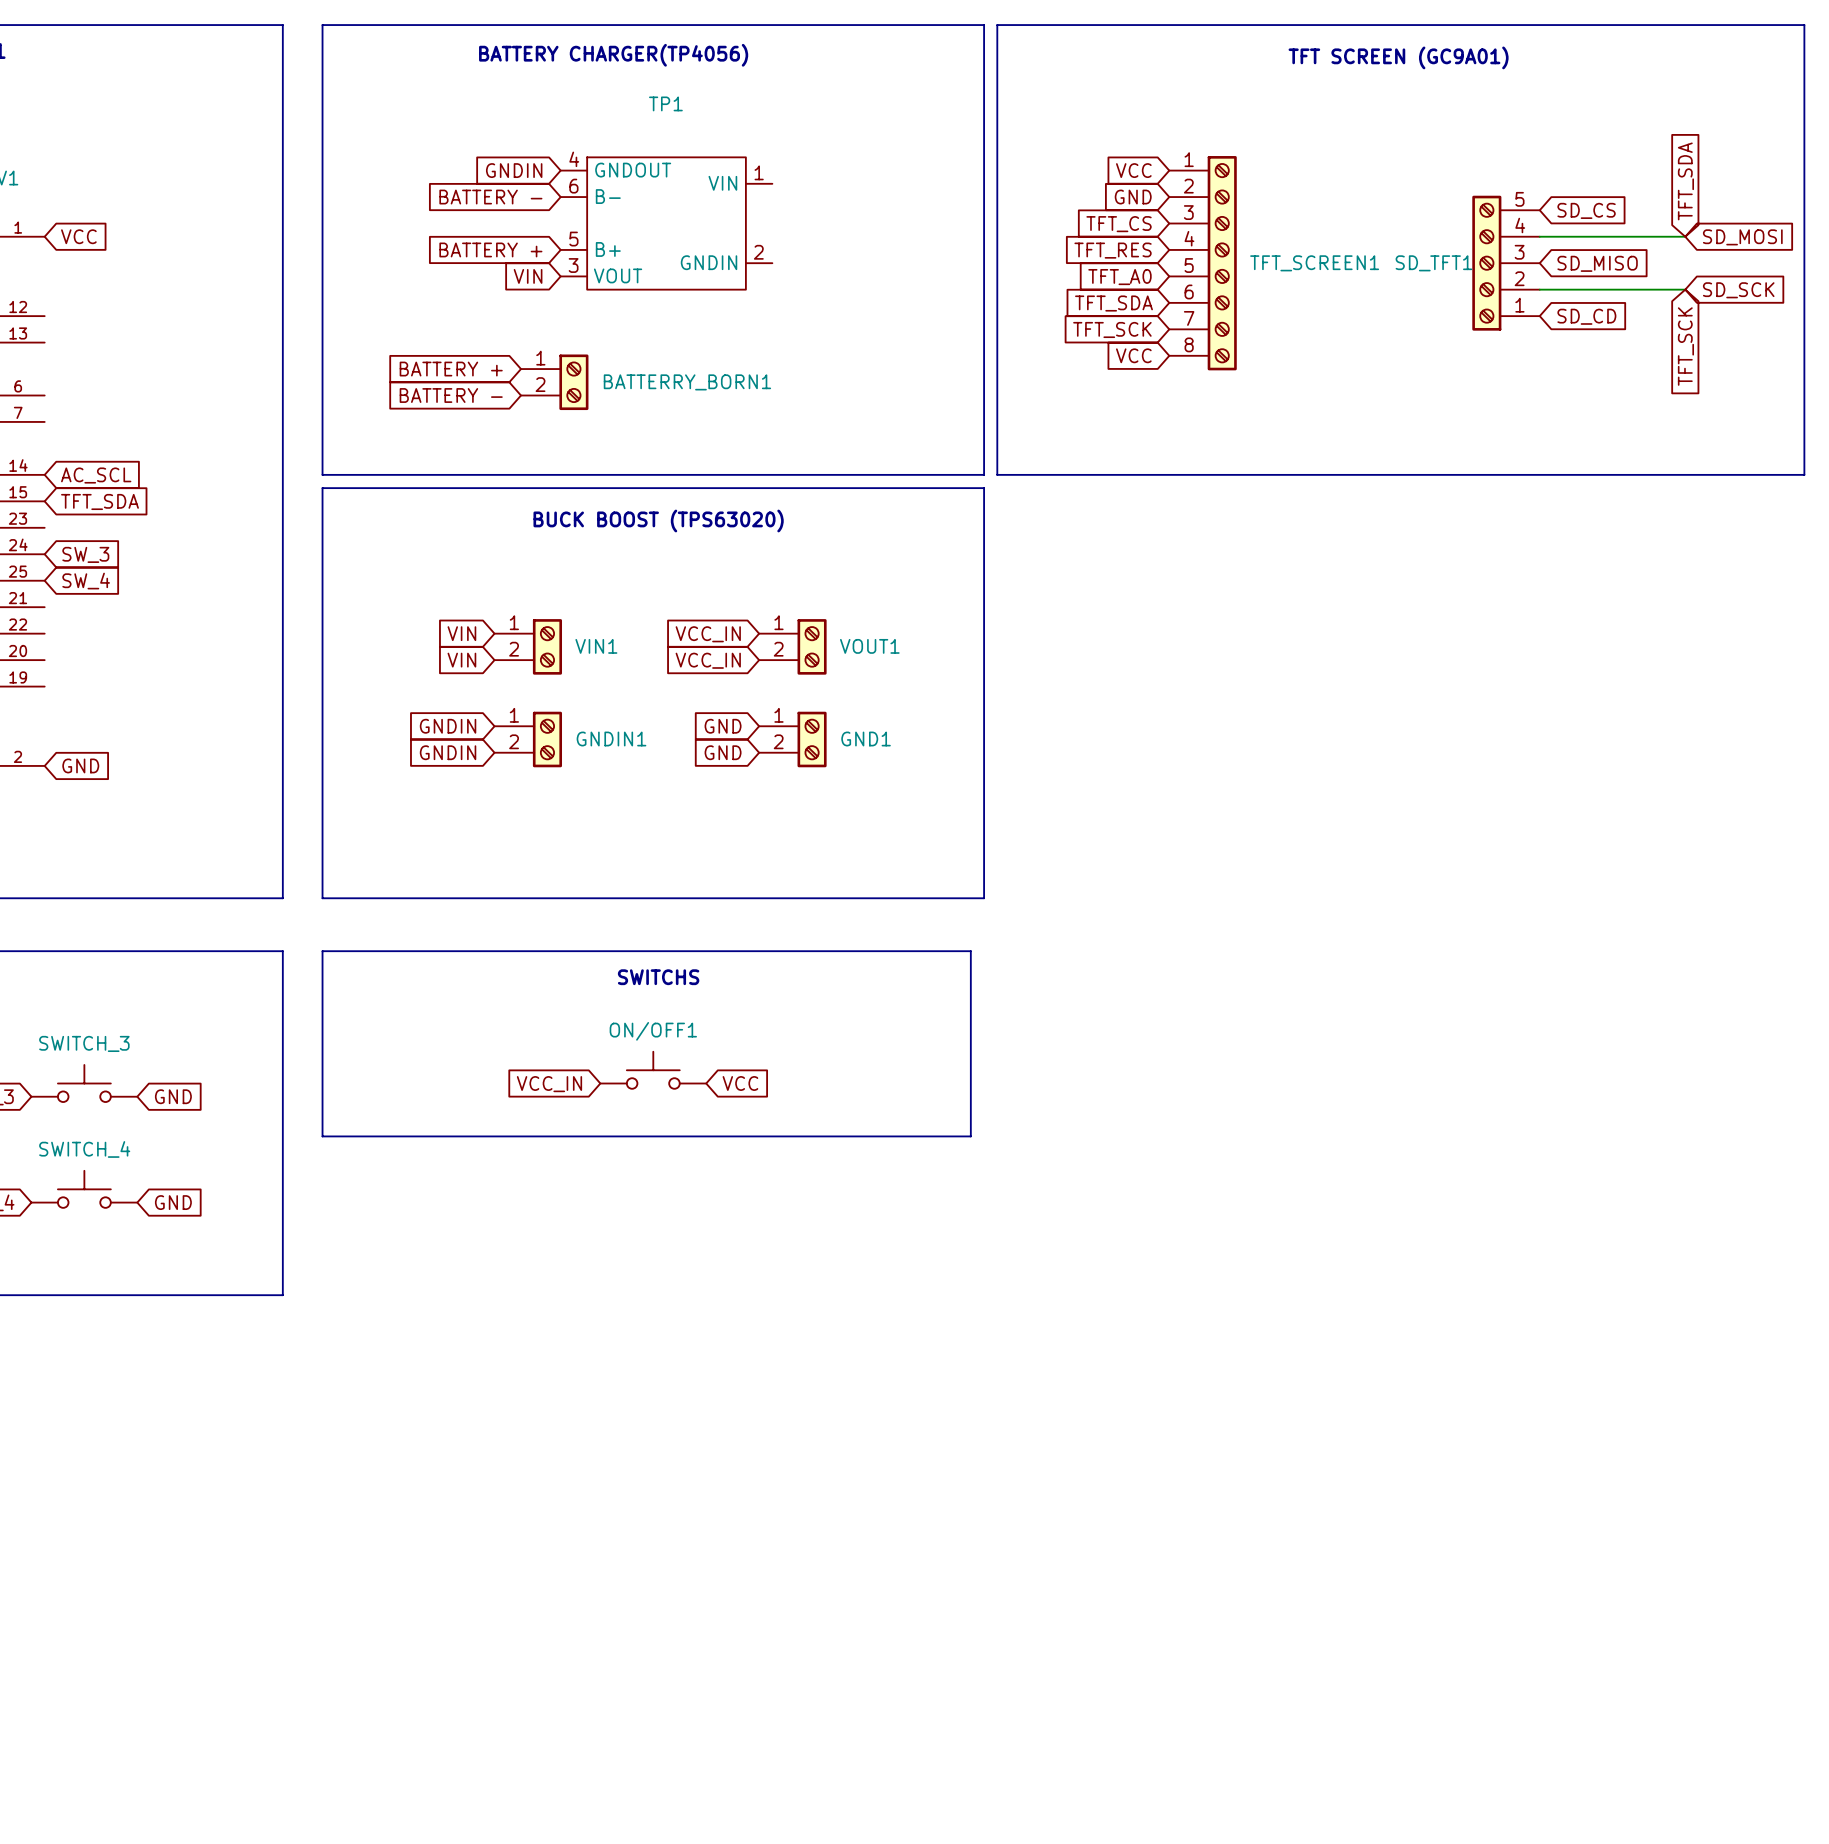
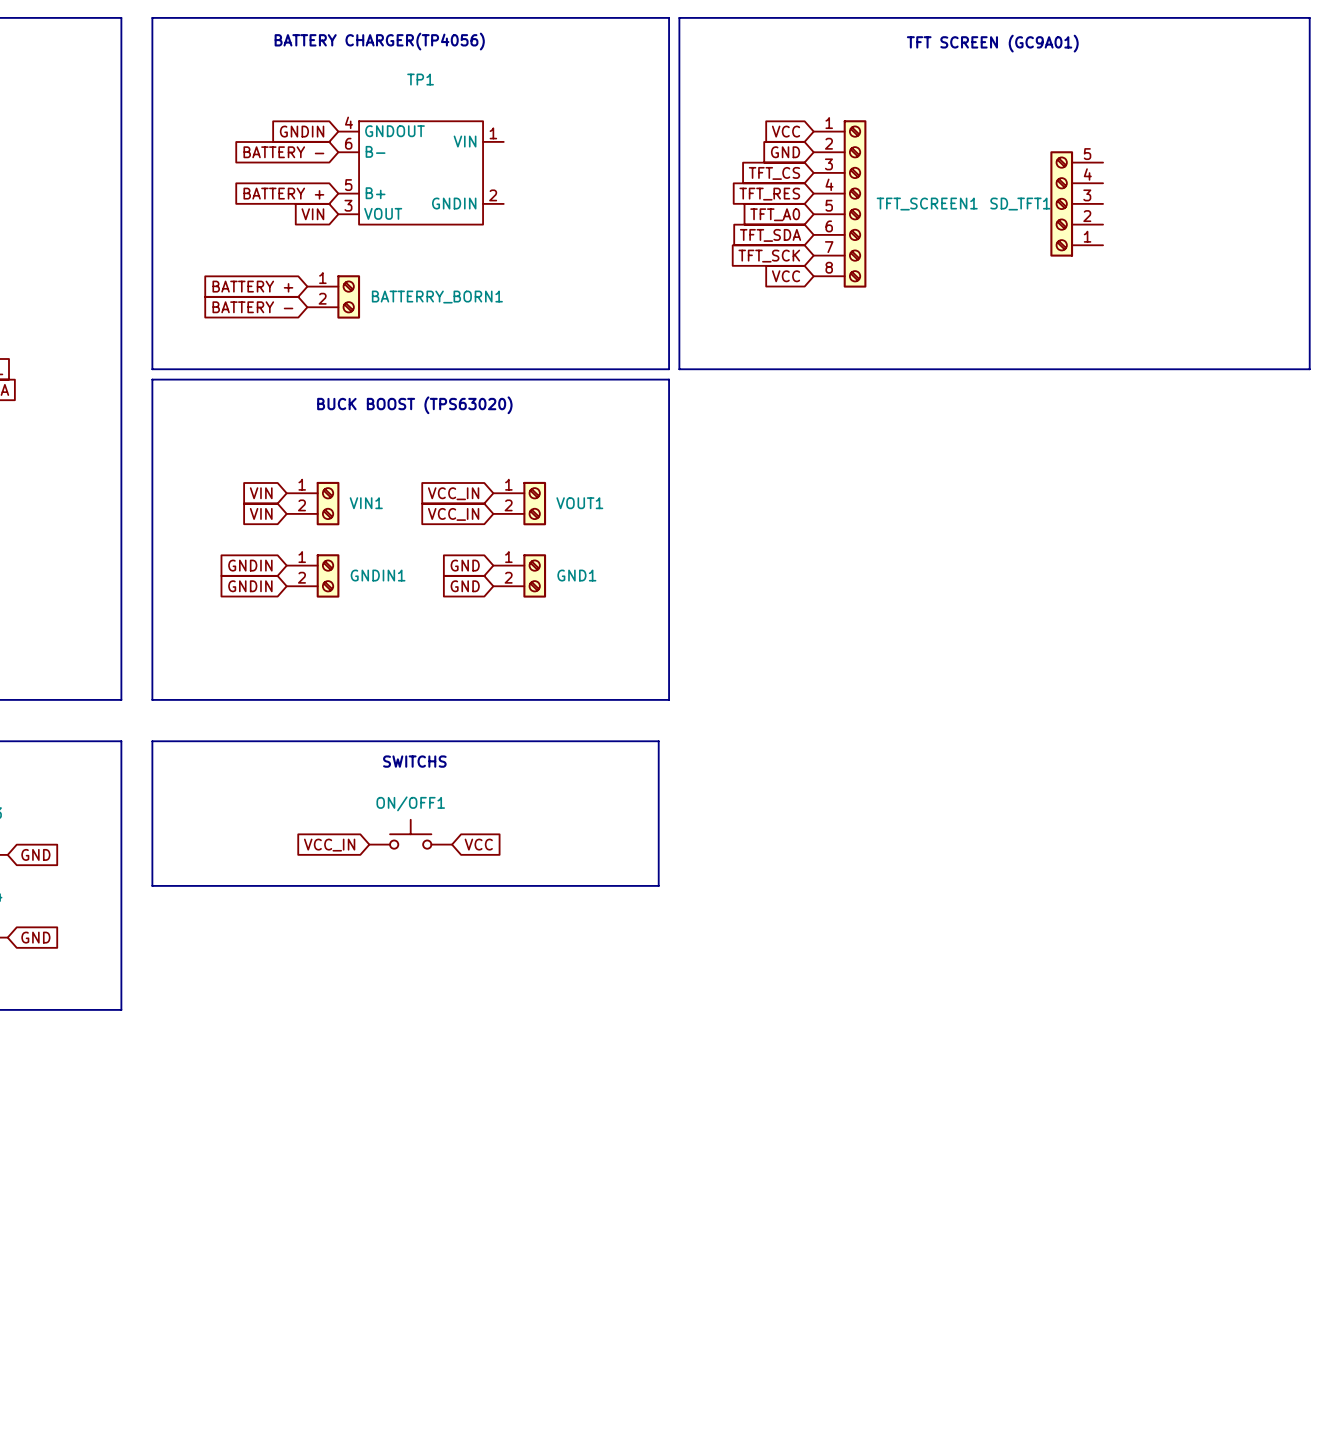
global label: TFT_SDA (1685, 181) -> none
global label: SD_CS (1586, 210) -> none
wire: (1539, 236) (1685, 236) -> none
global label: SD_MOSI (1742, 237) -> none
global label: SD_MISO (1597, 263) -> none
wire: (1539, 289) (1685, 289) -> none
global label: SD_SCK (1738, 290) -> none
global label: SD_CD (1586, 316) -> none
global label: TFT_SCK (1685, 346) -> none

